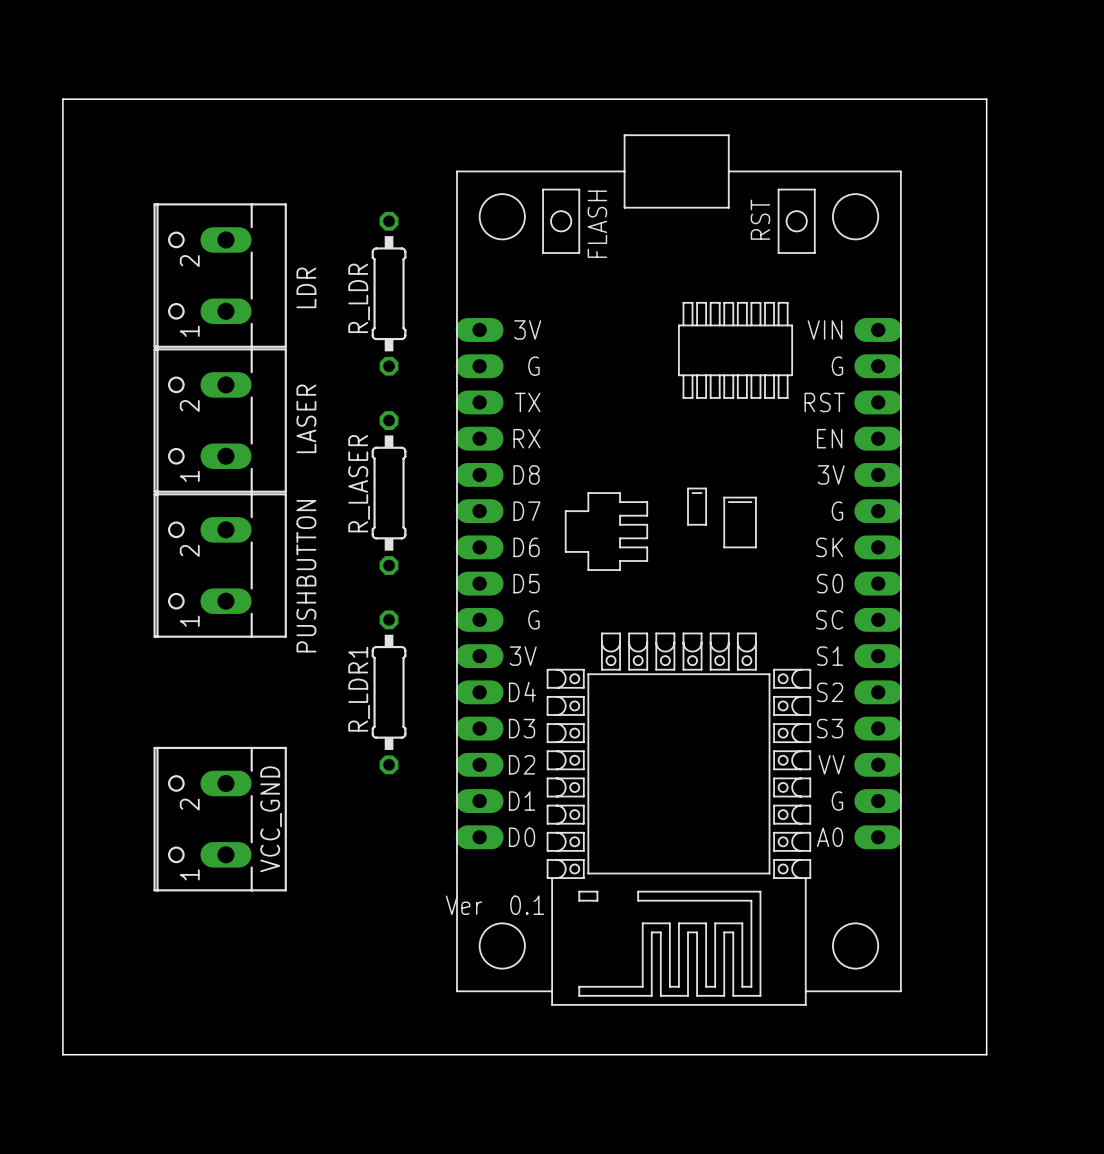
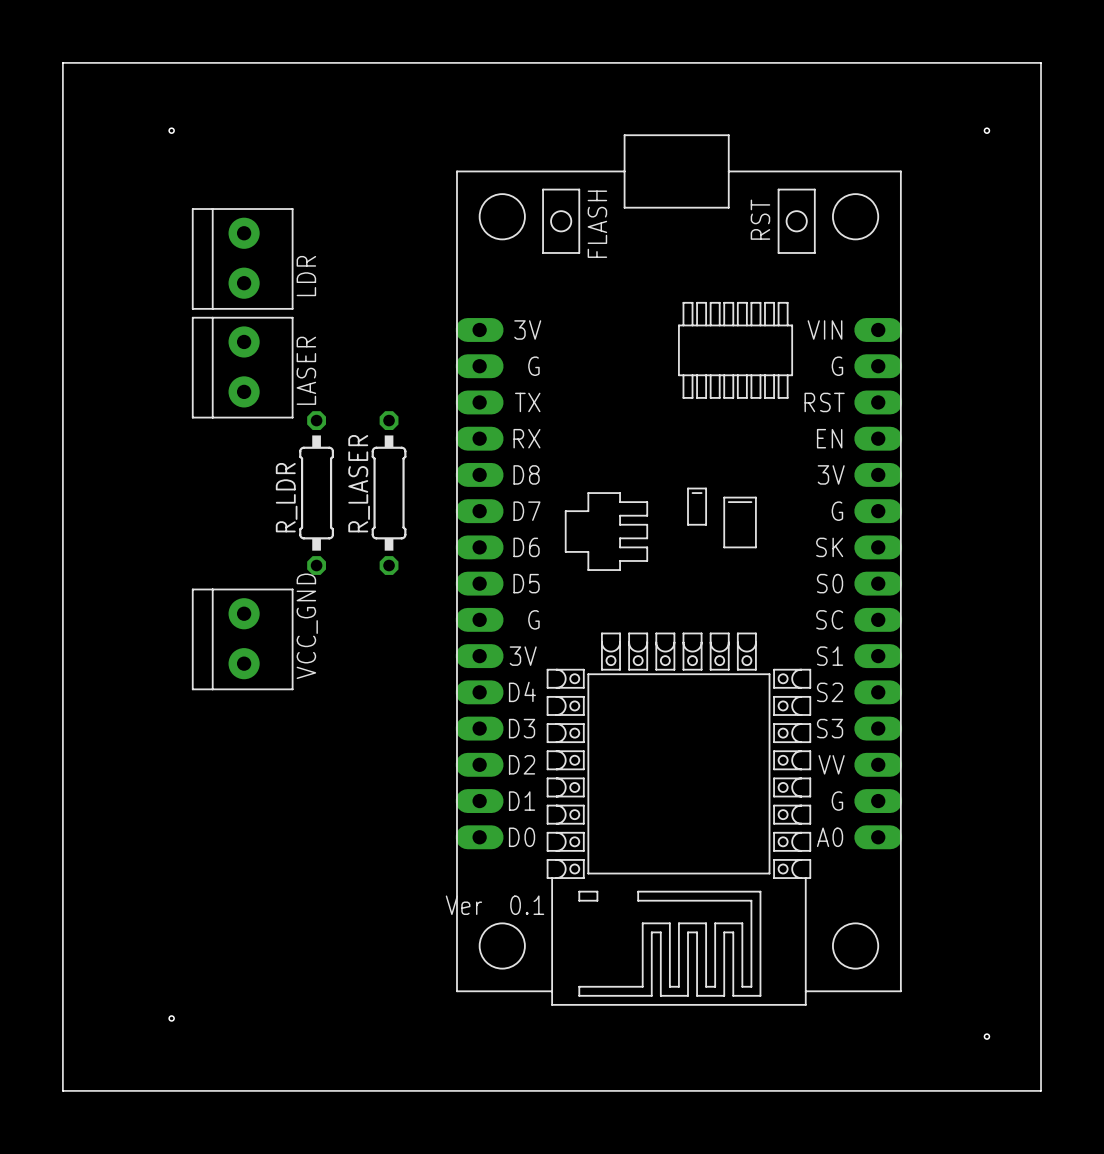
board edge: (62, 99) (986, 99) (986, 1054) (62, 1054) -> (62, 99) (62, 62) (1041, 62) (1041, 1090) (62, 1090) (62, 1054)
hole: none -> (171, 130)
hole: none -> (986, 130)
LDR: none -> (242, 258)
LDR: (220, 275) -> none
R_LDR position: (389, 293) -> (316, 493)
LASER: none -> (242, 367)
LASER: (220, 420) -> none
PUSHBUTTON: (220, 565) -> none
VCC_GND: none -> (242, 639)
R_LDR1: (389, 692) -> none
VCC_GND: (220, 819) -> none
hole: none -> (171, 1018)
hole: none -> (986, 1036)

